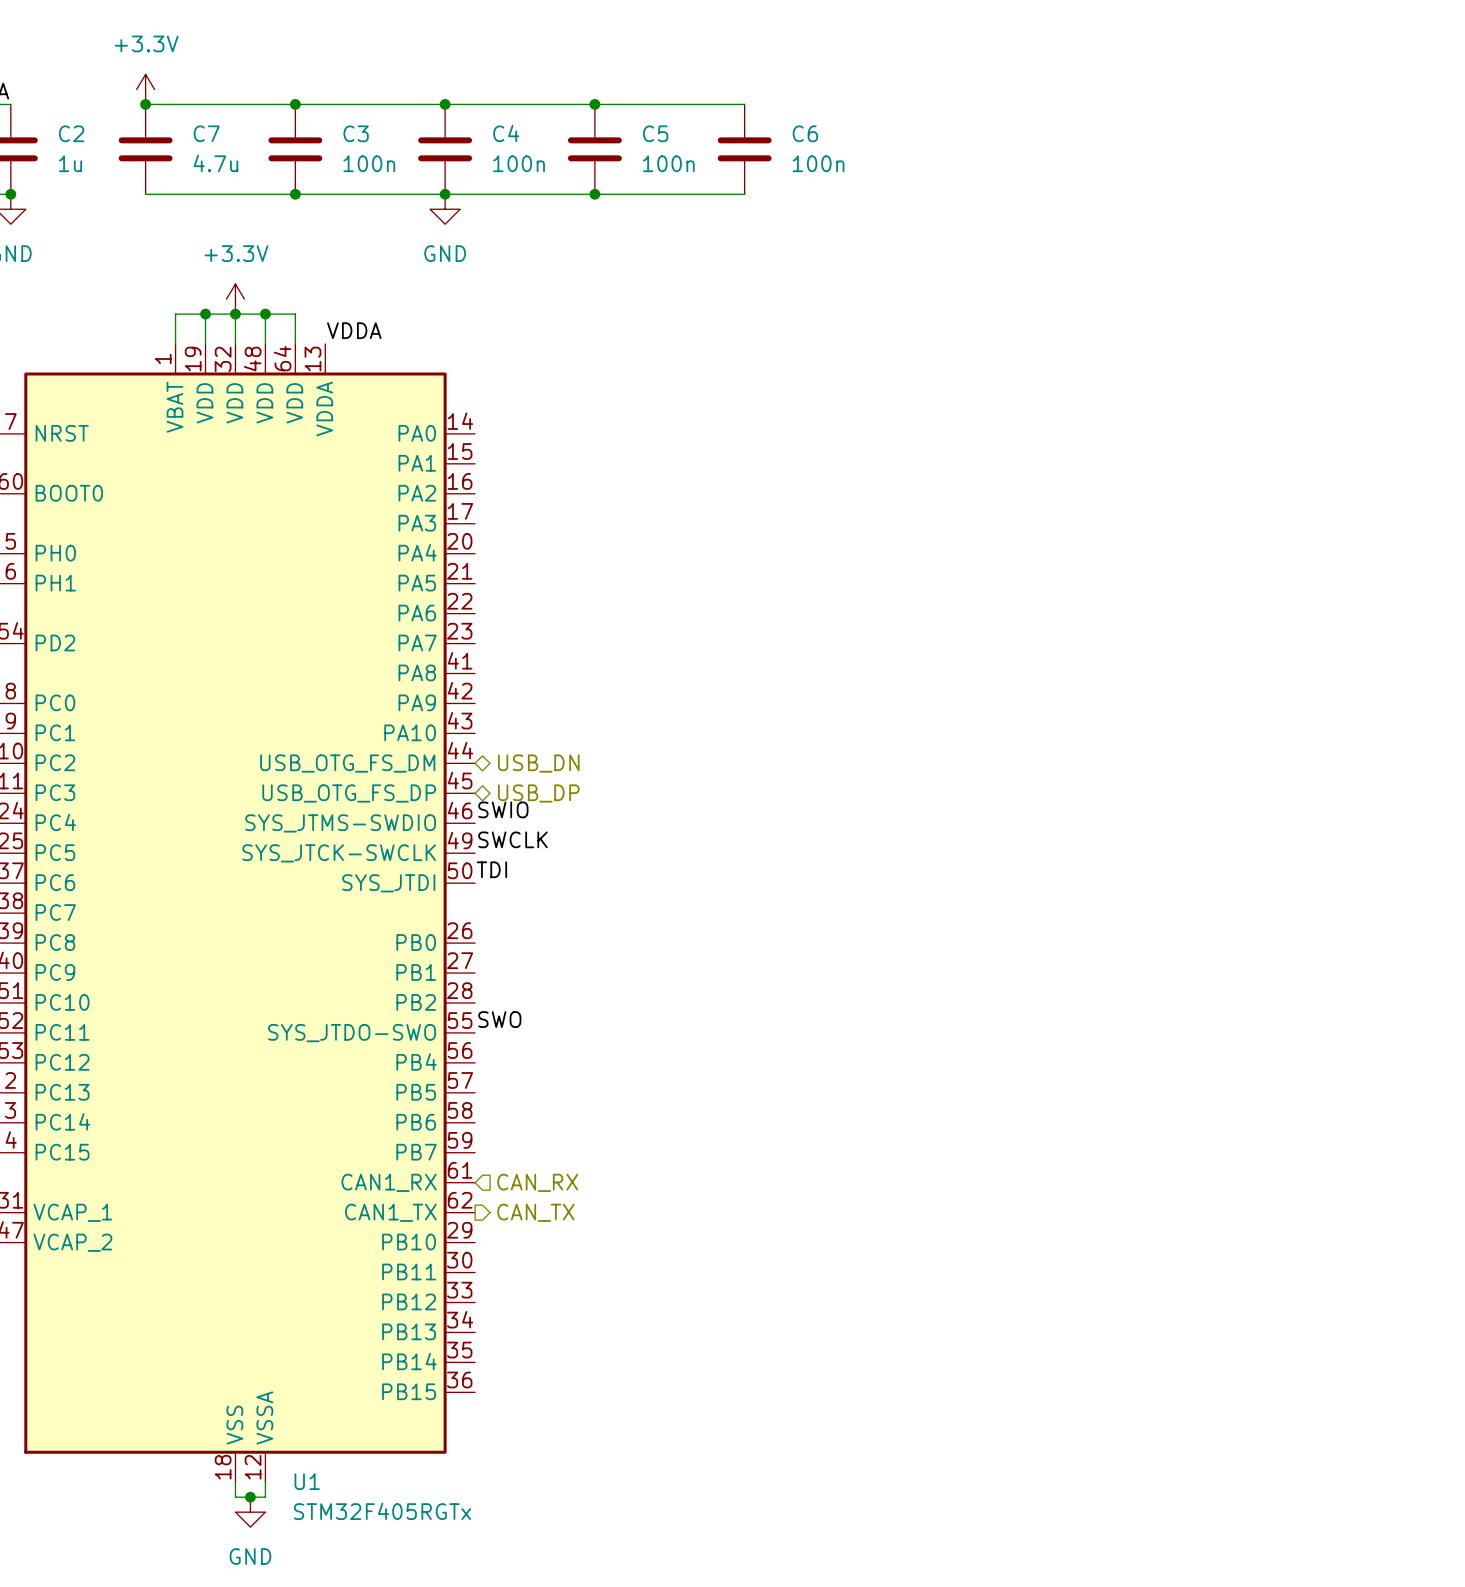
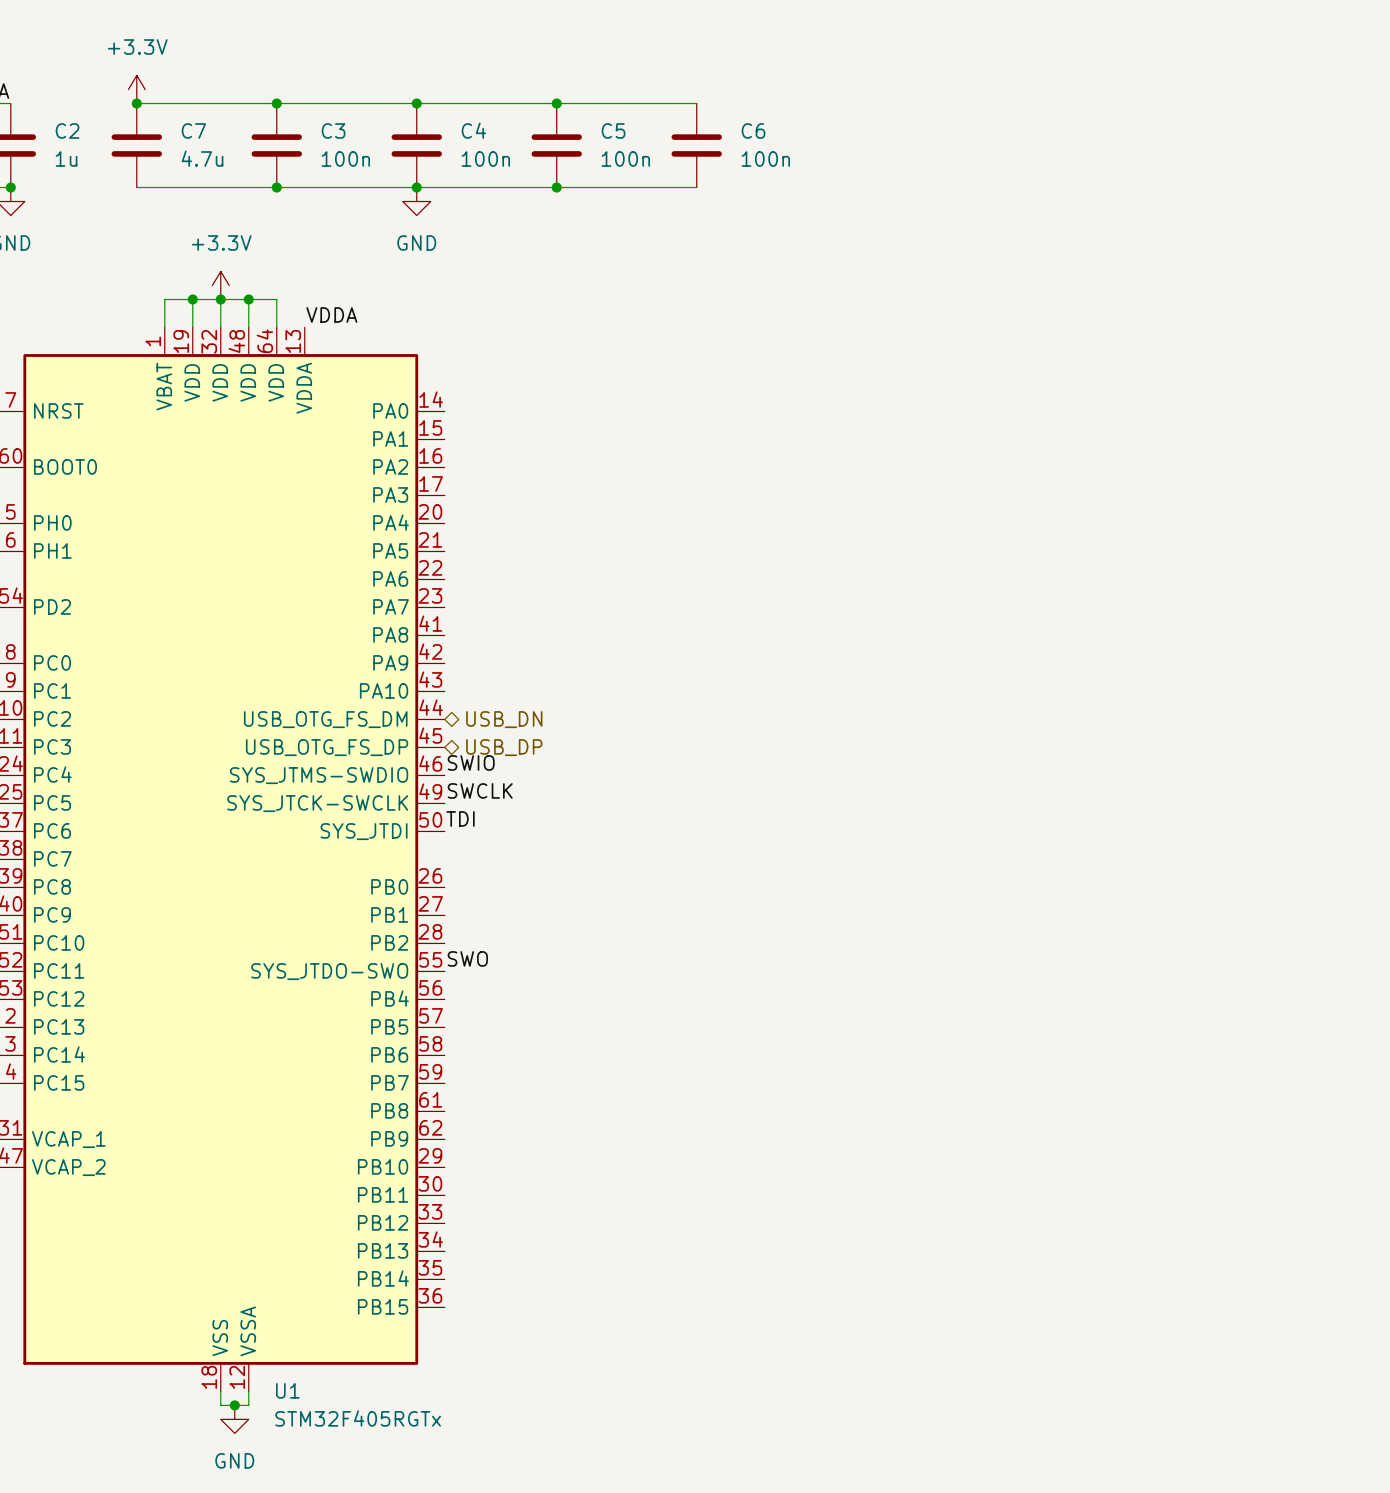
U1 pin name: CAN1_RX (389, 1182) -> PB8 (389, 1110)
hierarchical label: CAN_RX (537, 1182) -> none
U1 pin name: CAN1_TX (390, 1212) -> PB9 (389, 1138)
hierarchical label: CAN_TX (535, 1212) -> none

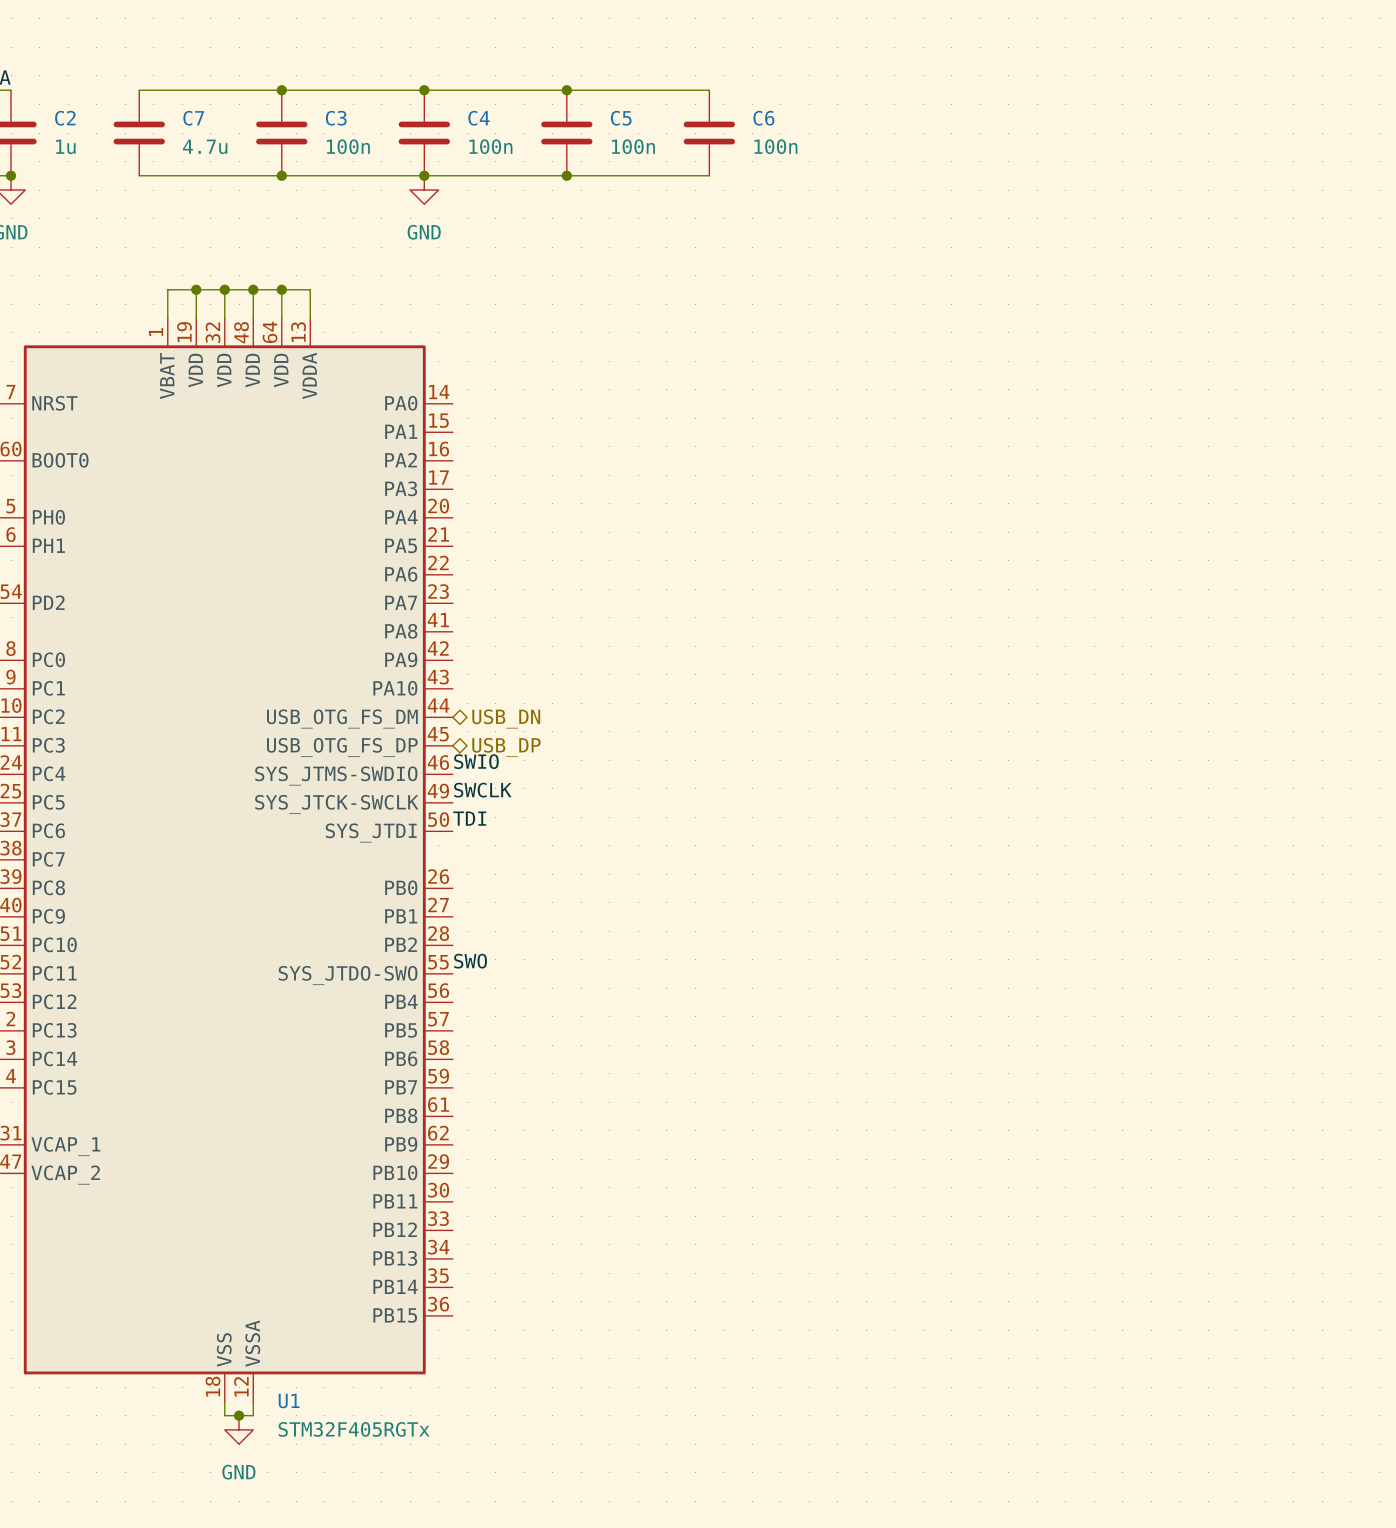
power symbol: +3.3V (136, 89) -> none
junction: (136, 103) -> none
power symbol: +3.3V (220, 285) -> none
wire: none -> (281, 289) (310, 289) (310, 318)
junction: none -> (281, 289)
label: VDDA (331, 315) -> none

